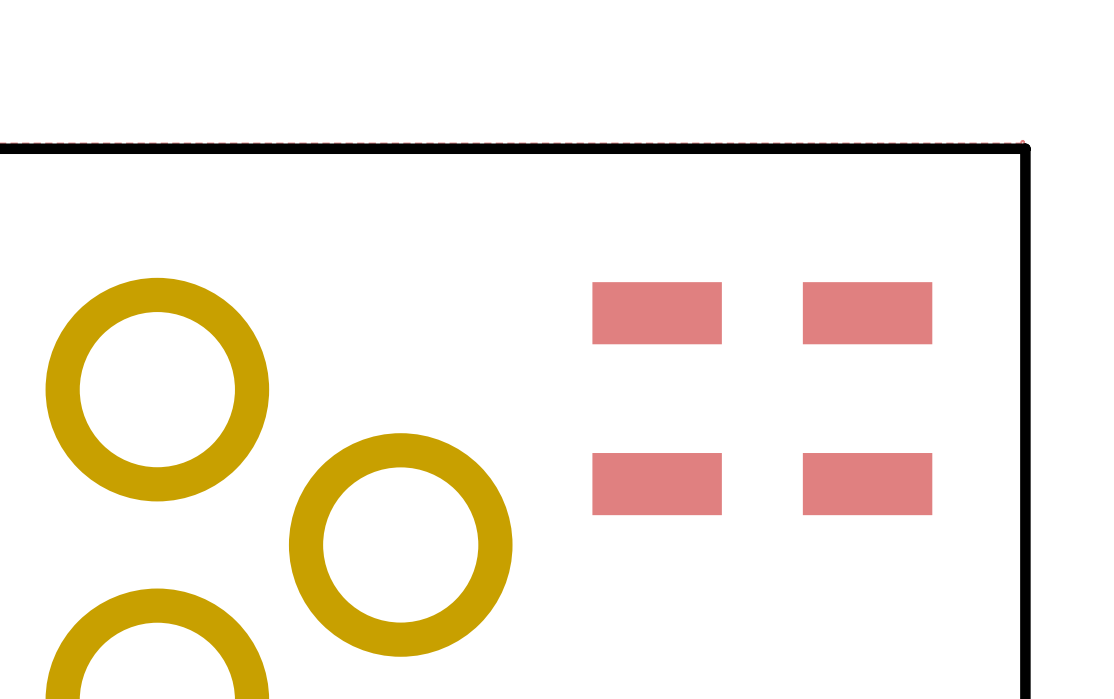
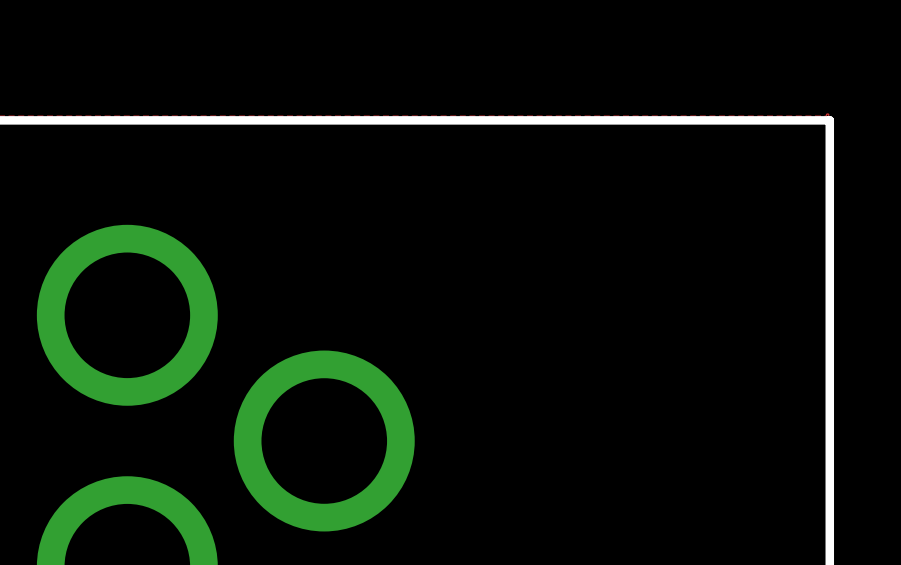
part: (657, 398) -> none
part: (867, 398) -> none

